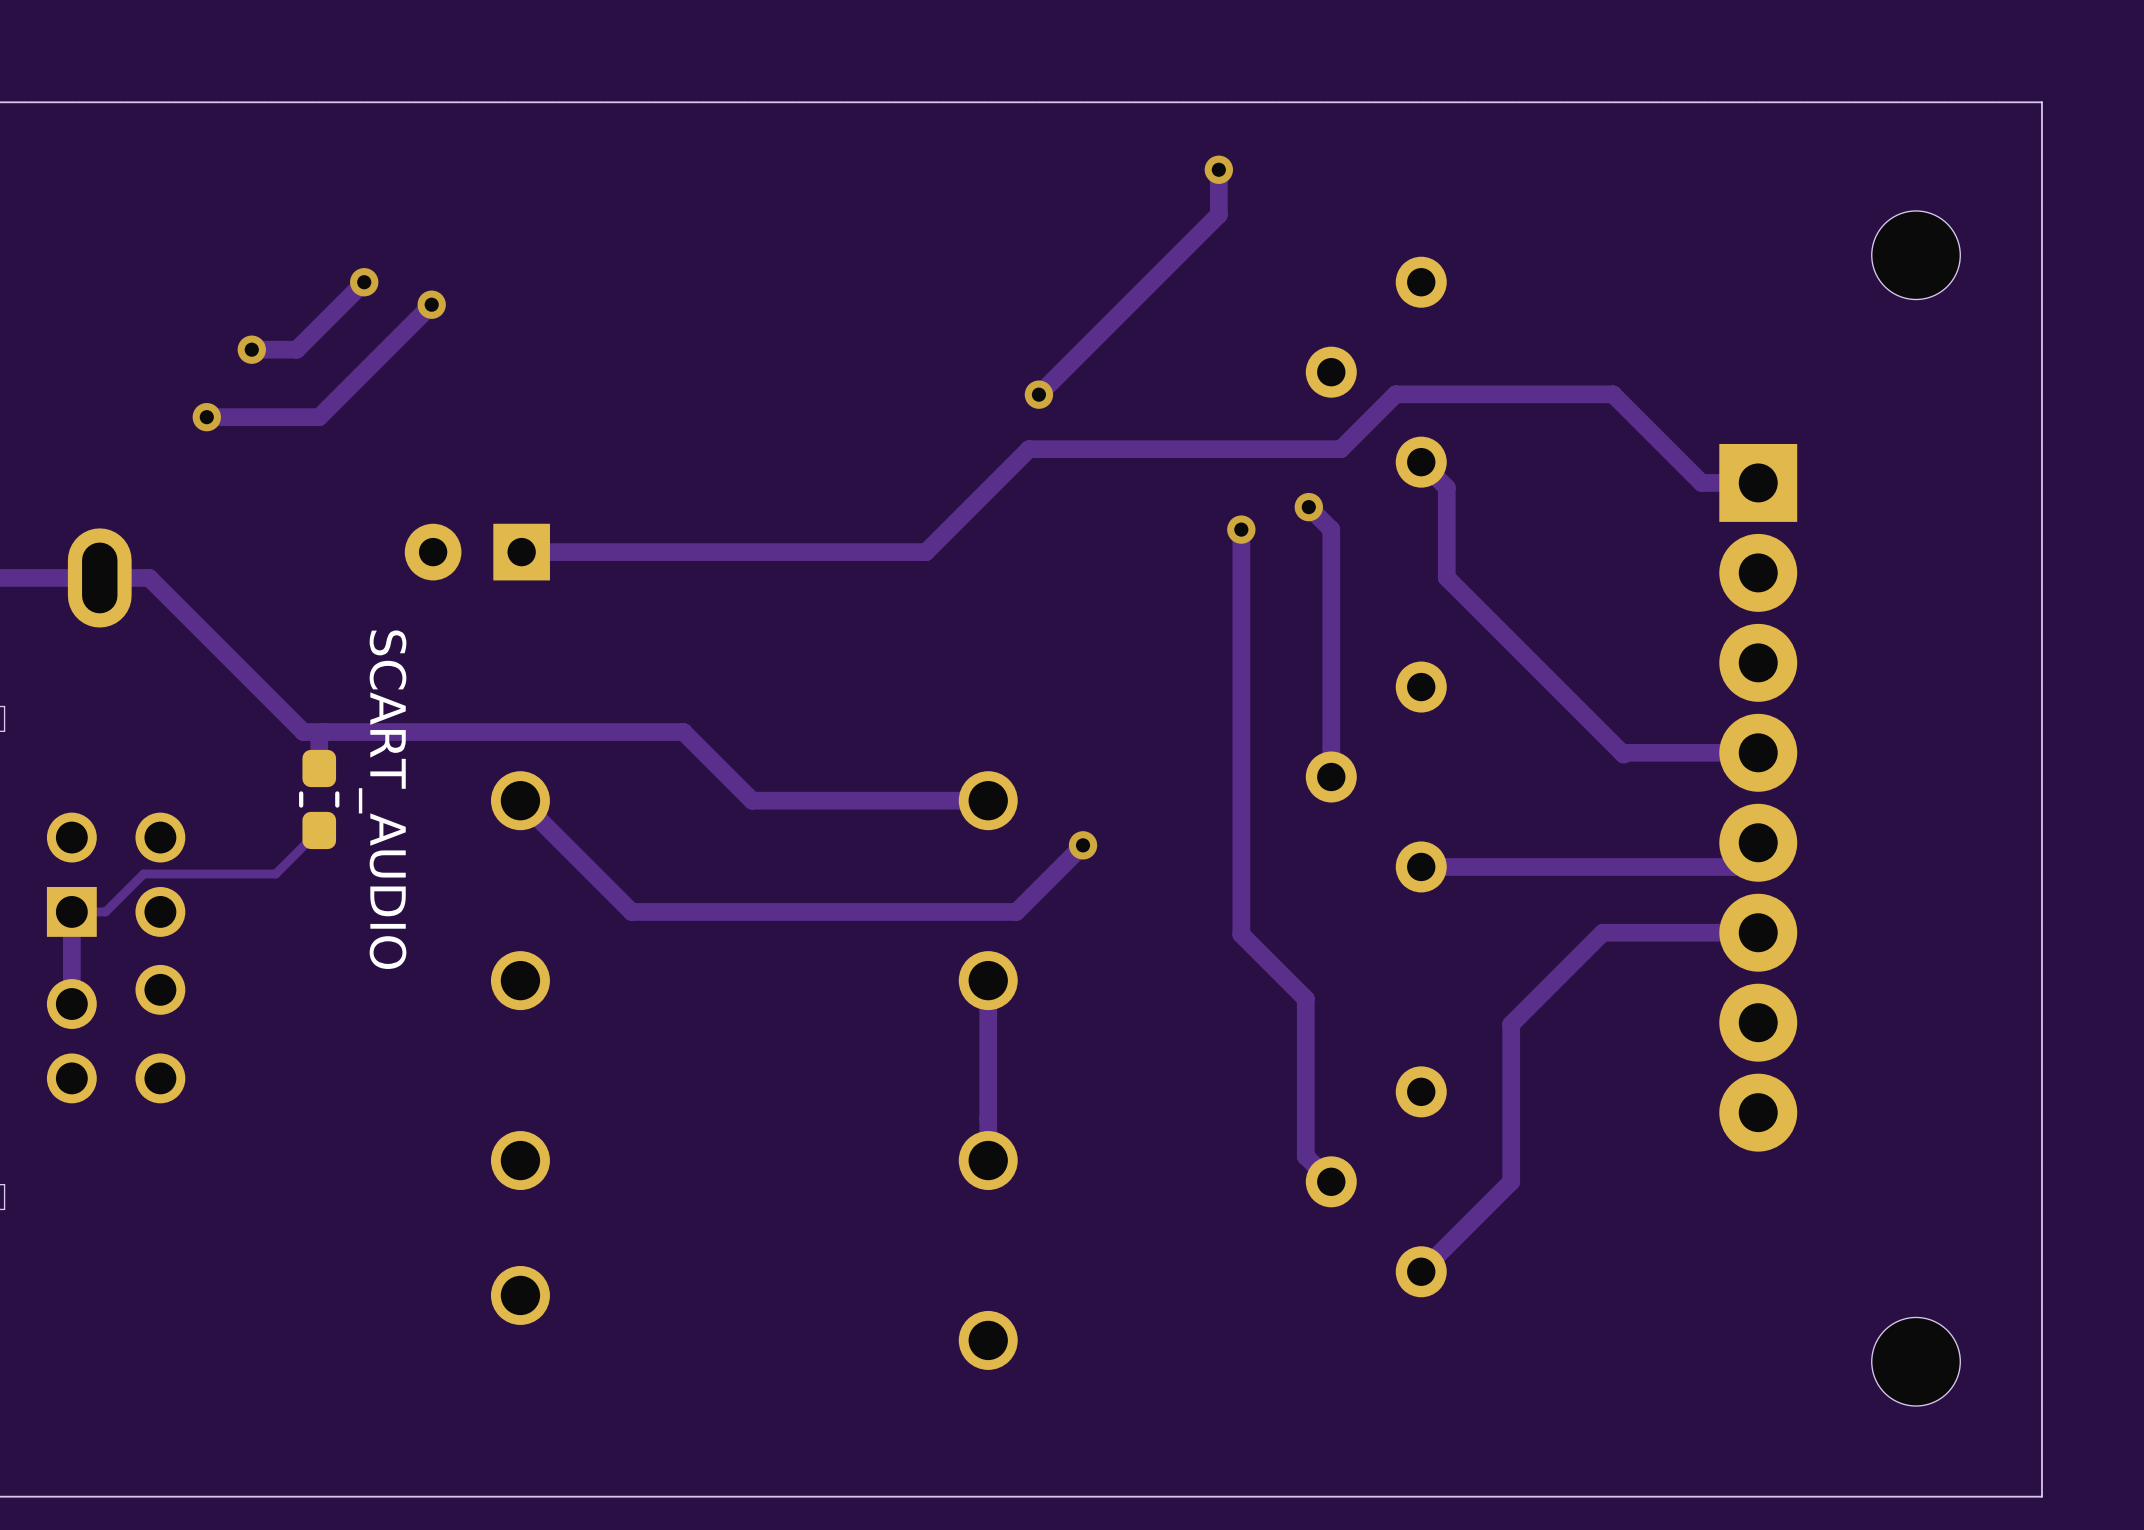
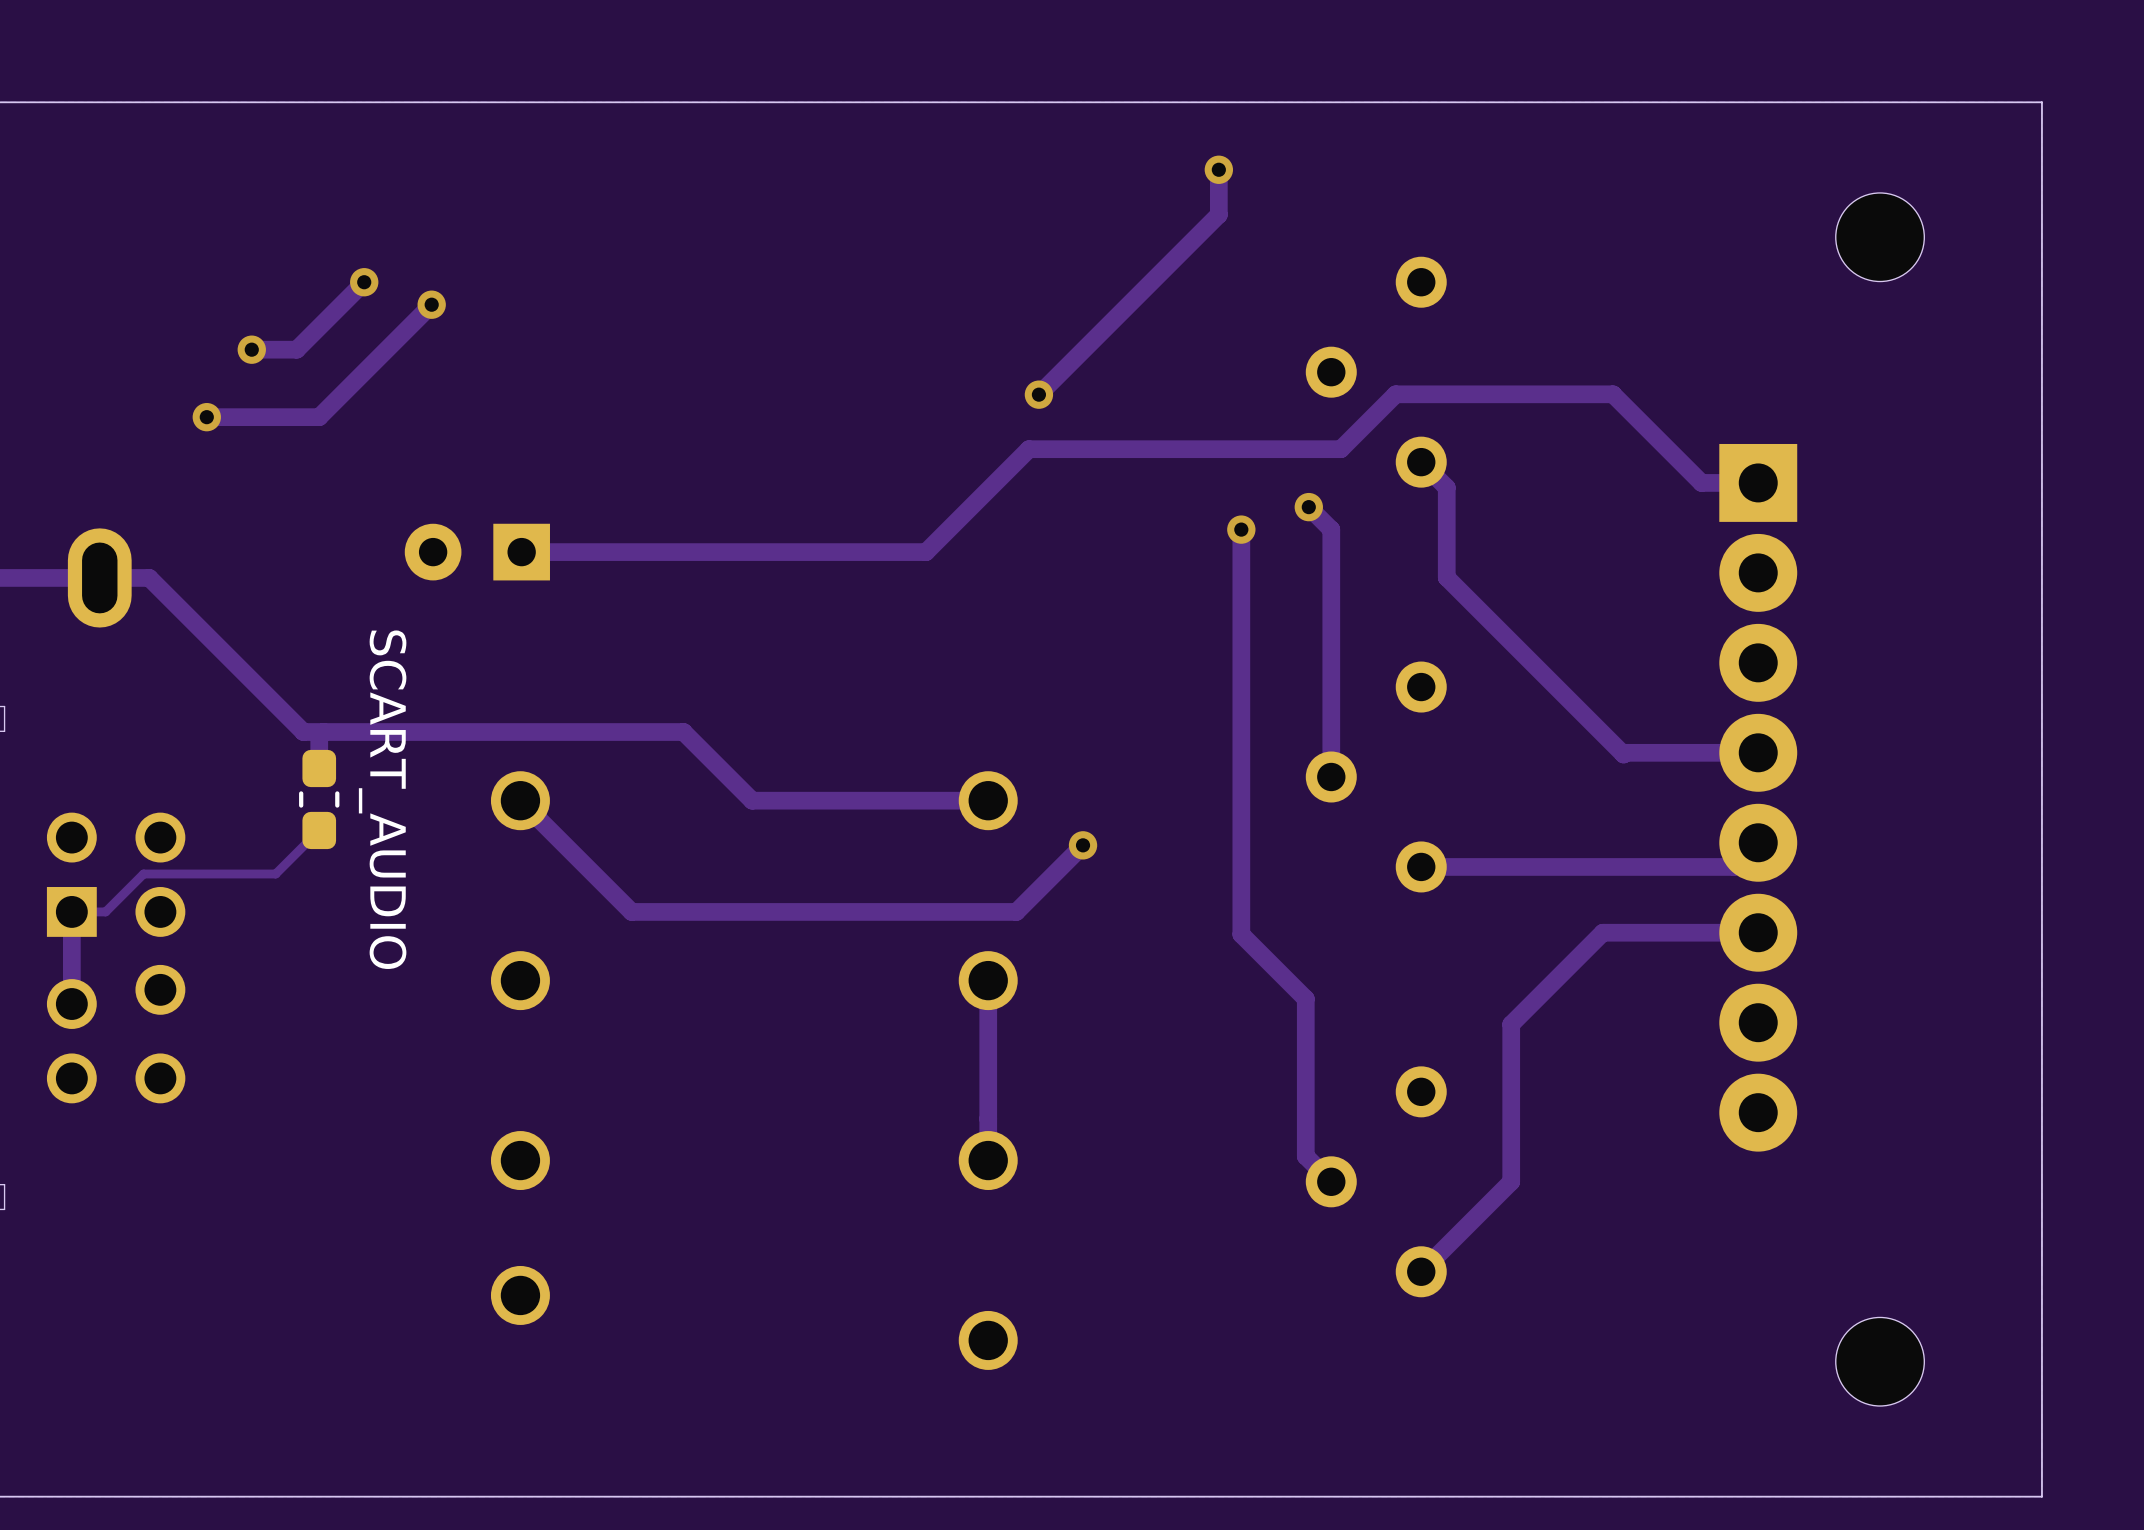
part position: (1916, 255) -> (1880, 237)
part position: (1916, 1361) -> (1880, 1361)

